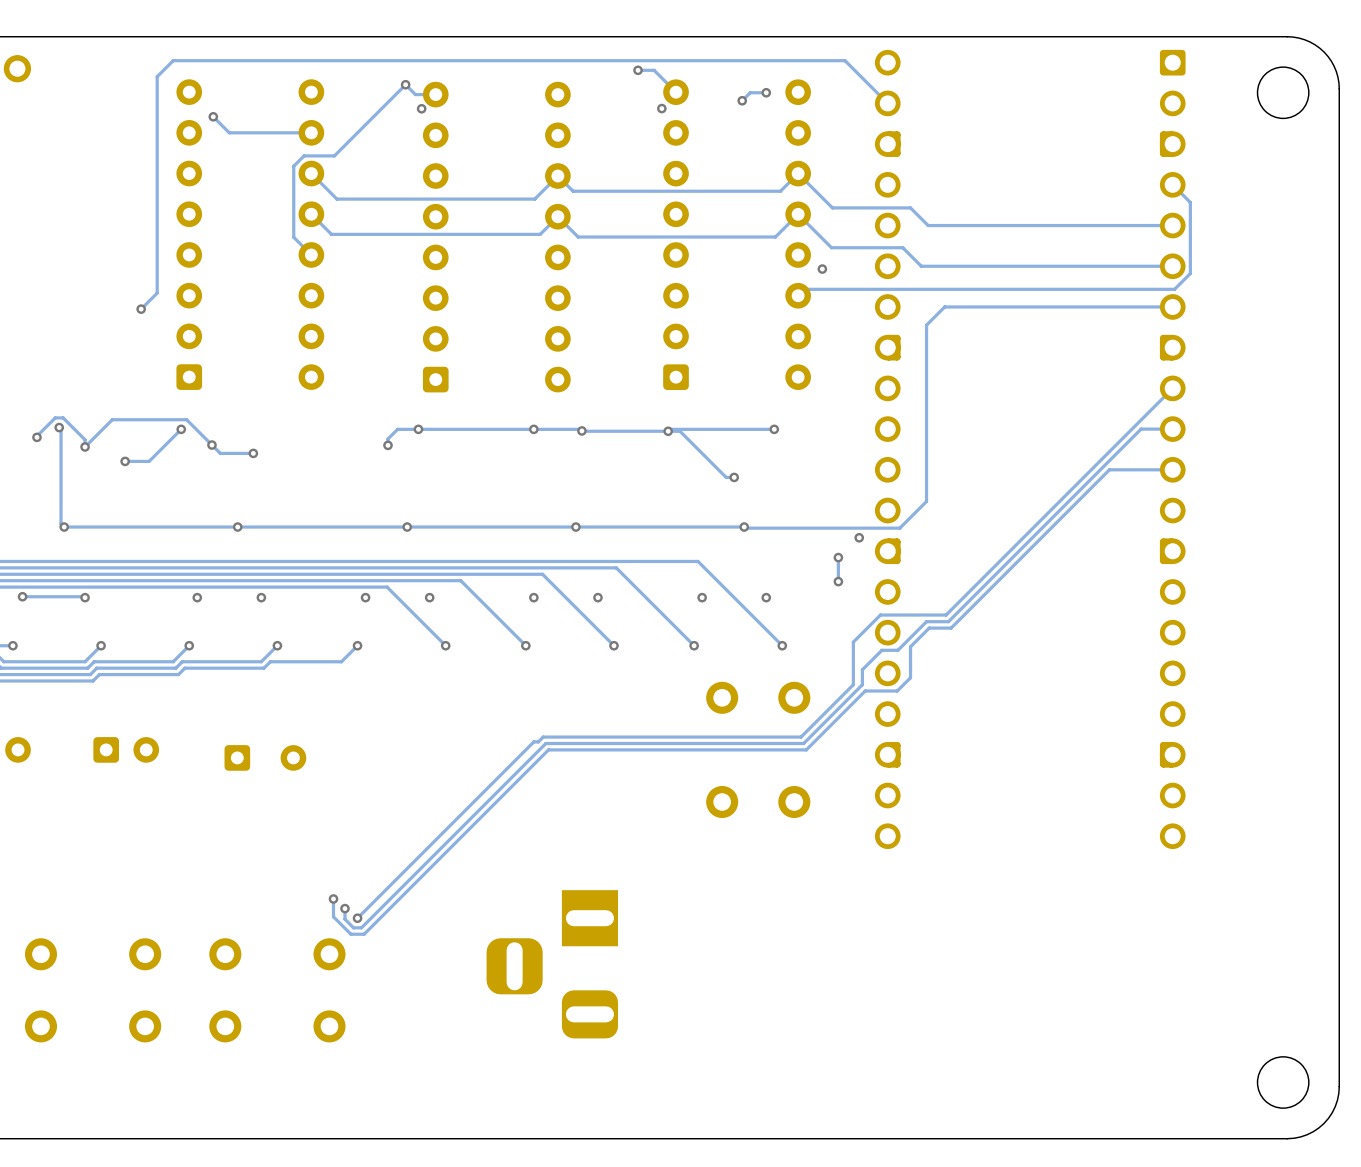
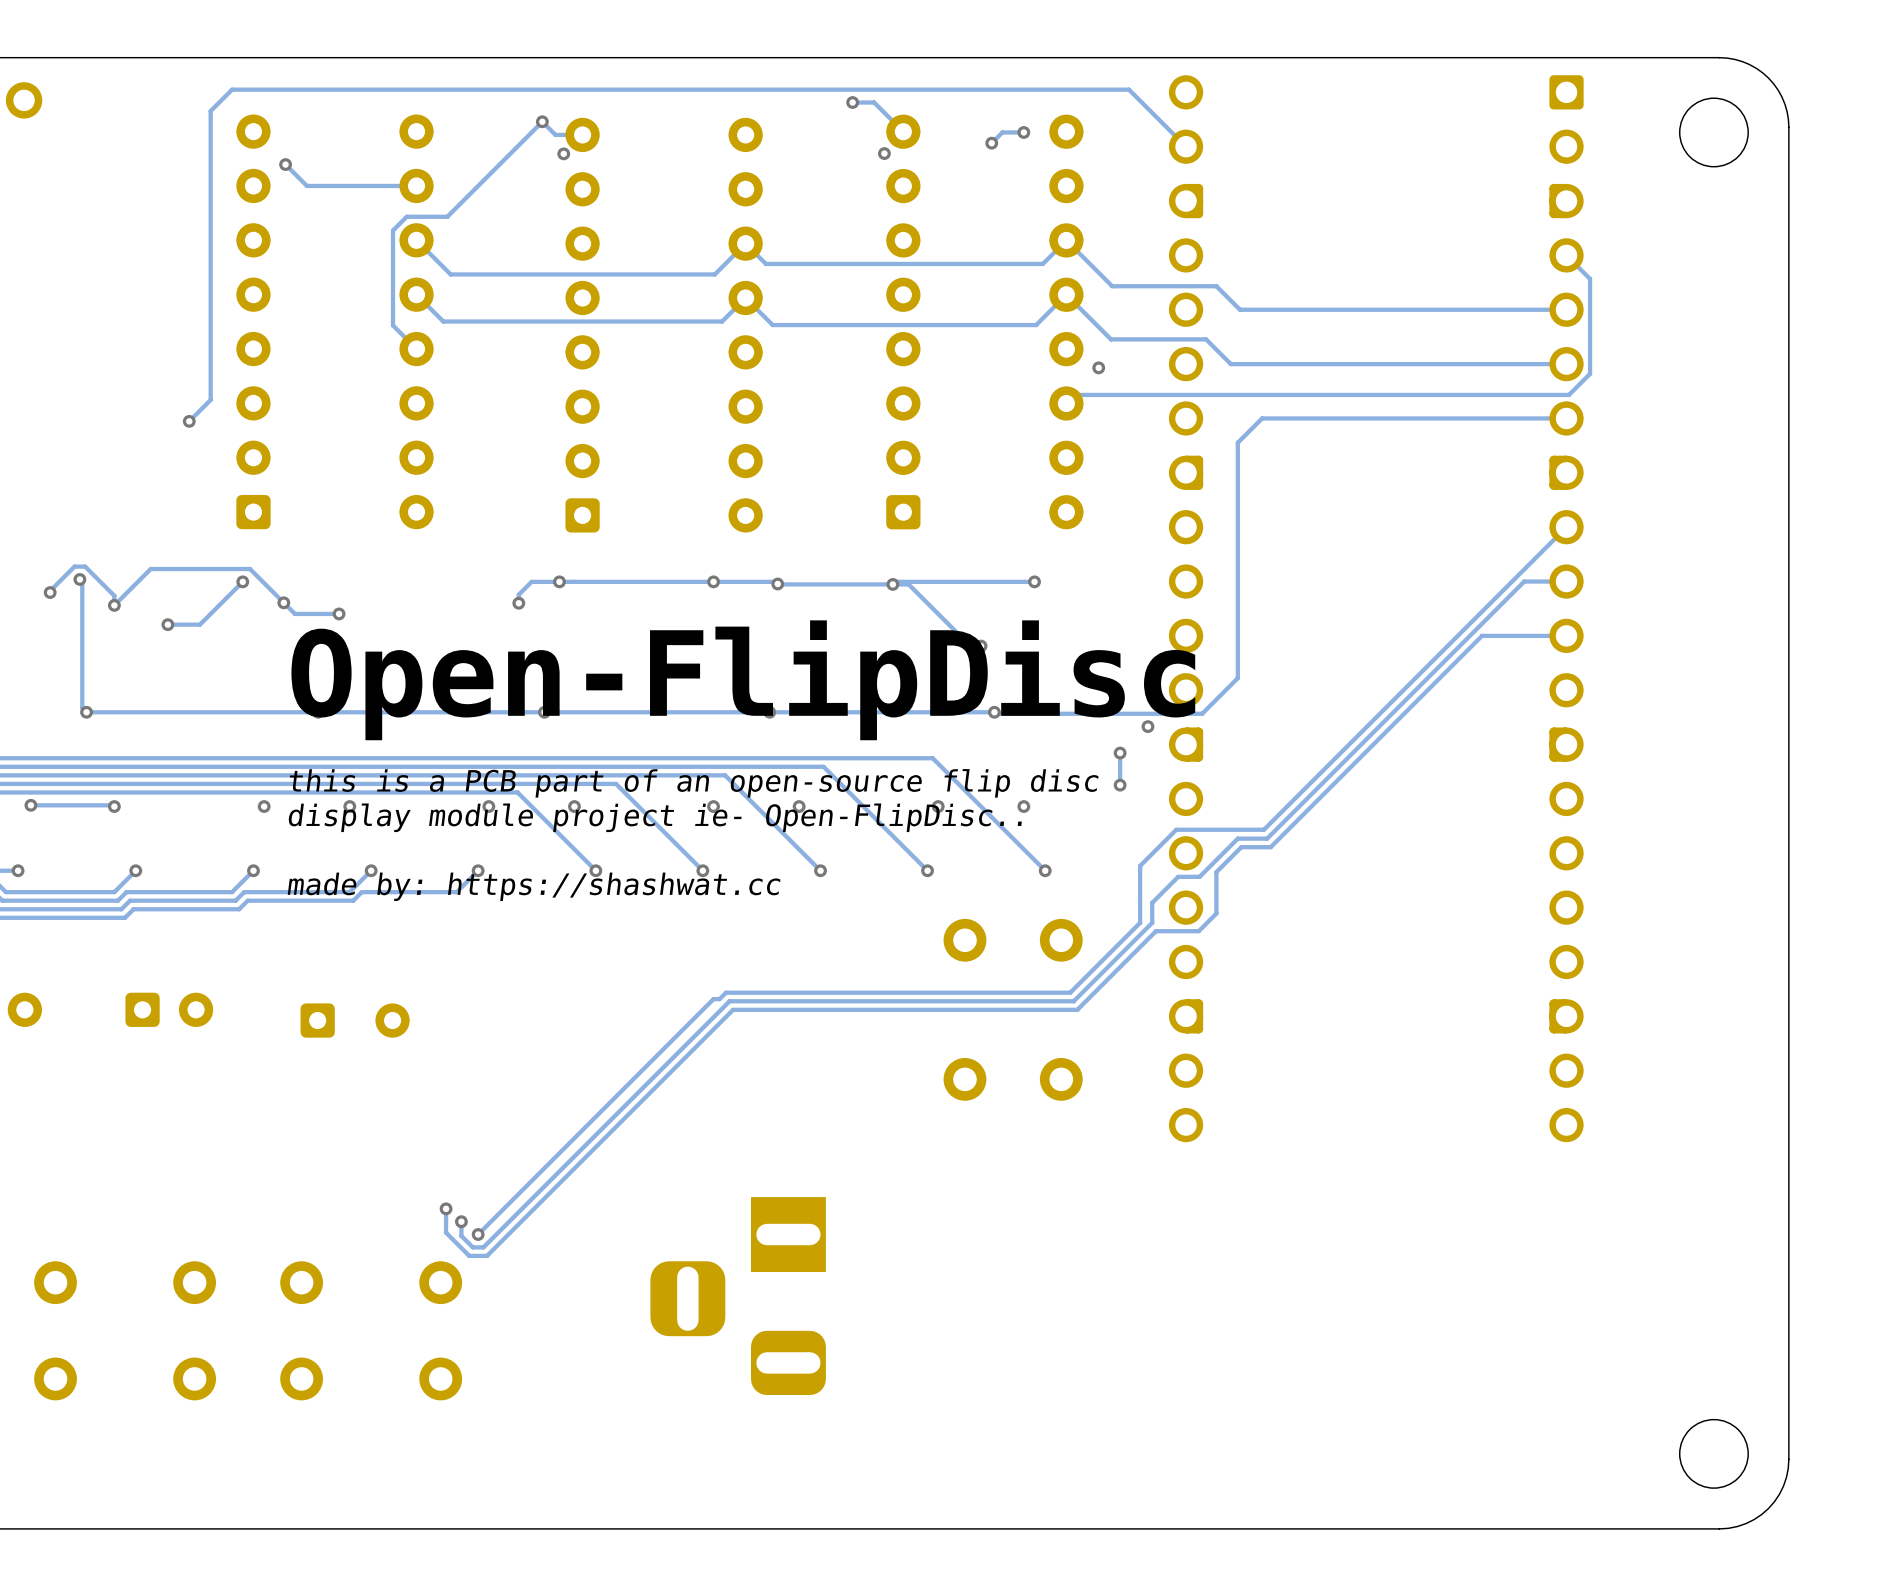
text: none -> Open-FlipDisc (743, 680)
text: none -> this is a PCB part of an open-source flip disc (694, 783)
text: none -> display module project ie- Open-FlipDisc.. (655, 817)
text: none -> made by: https://shashwat.cc (534, 886)

